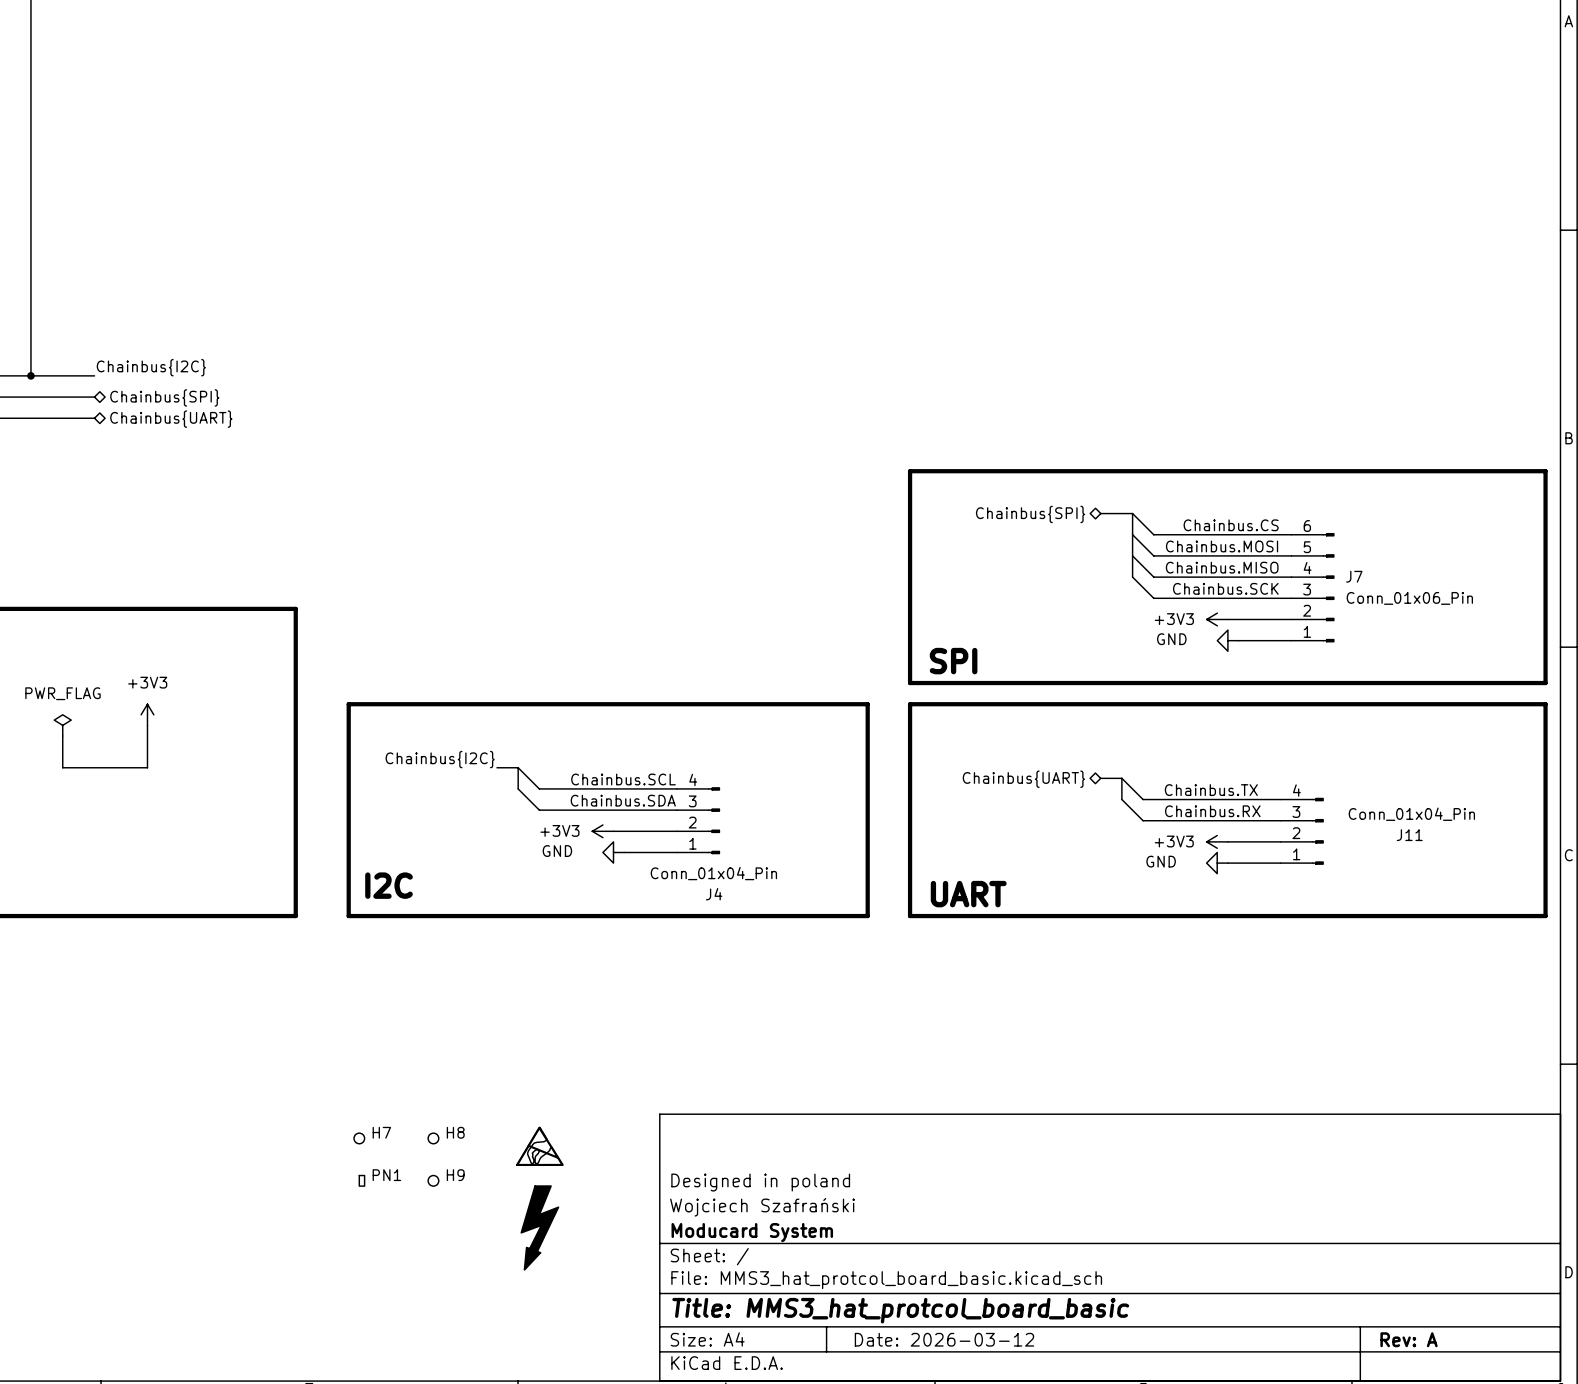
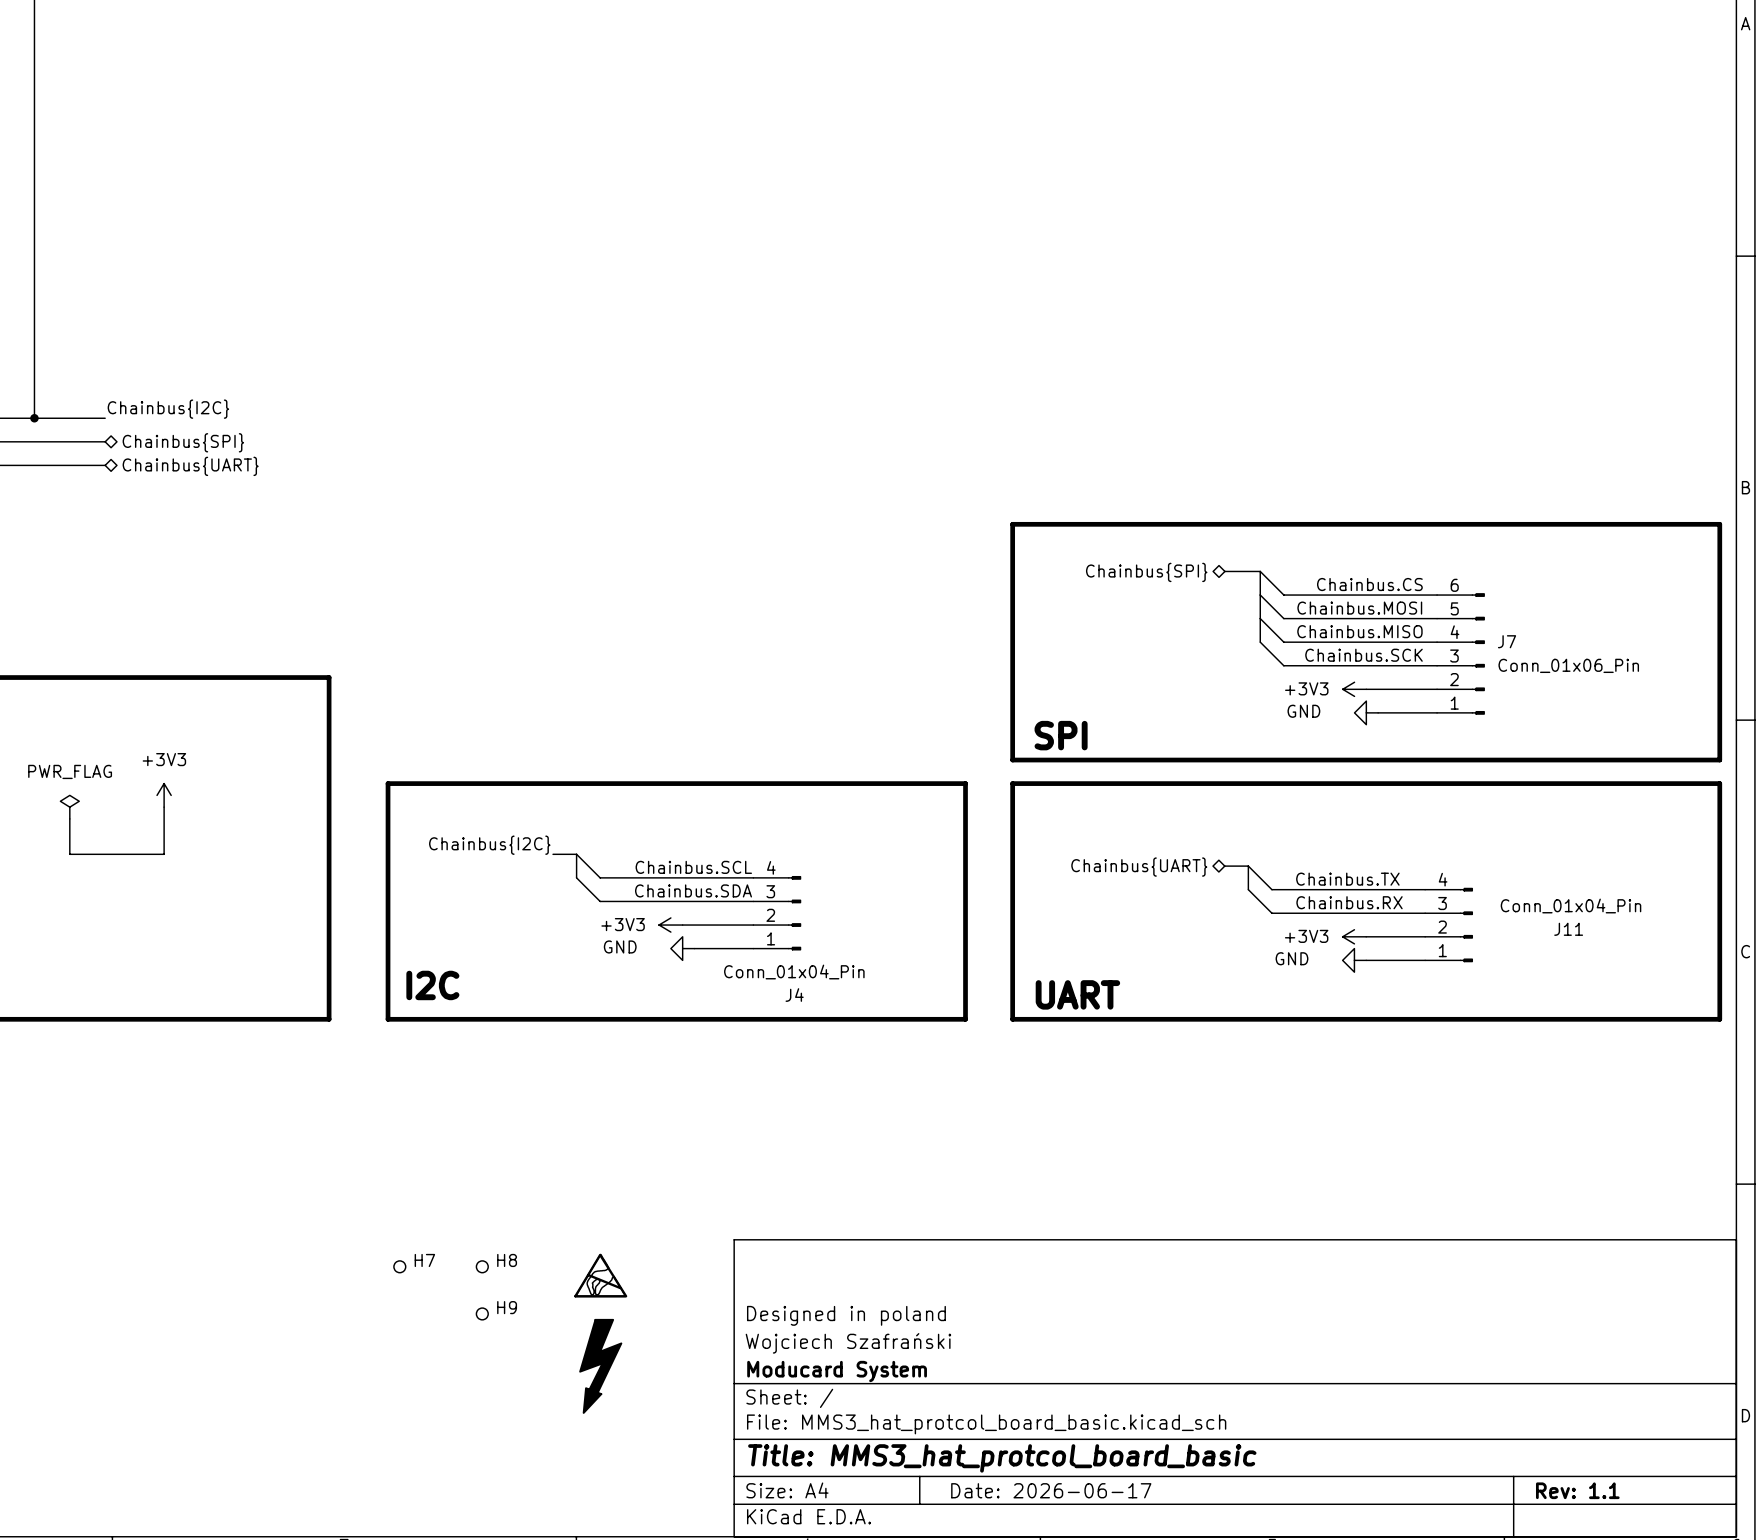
PN1: (361, 1180) -> none
title block: Date: 2026-03-12 (944, 1339) -> Date: 2026-06-17 (1051, 1490)
title block: Rev: A (1409, 1339) -> Rev: 1.1 (1577, 1490)

